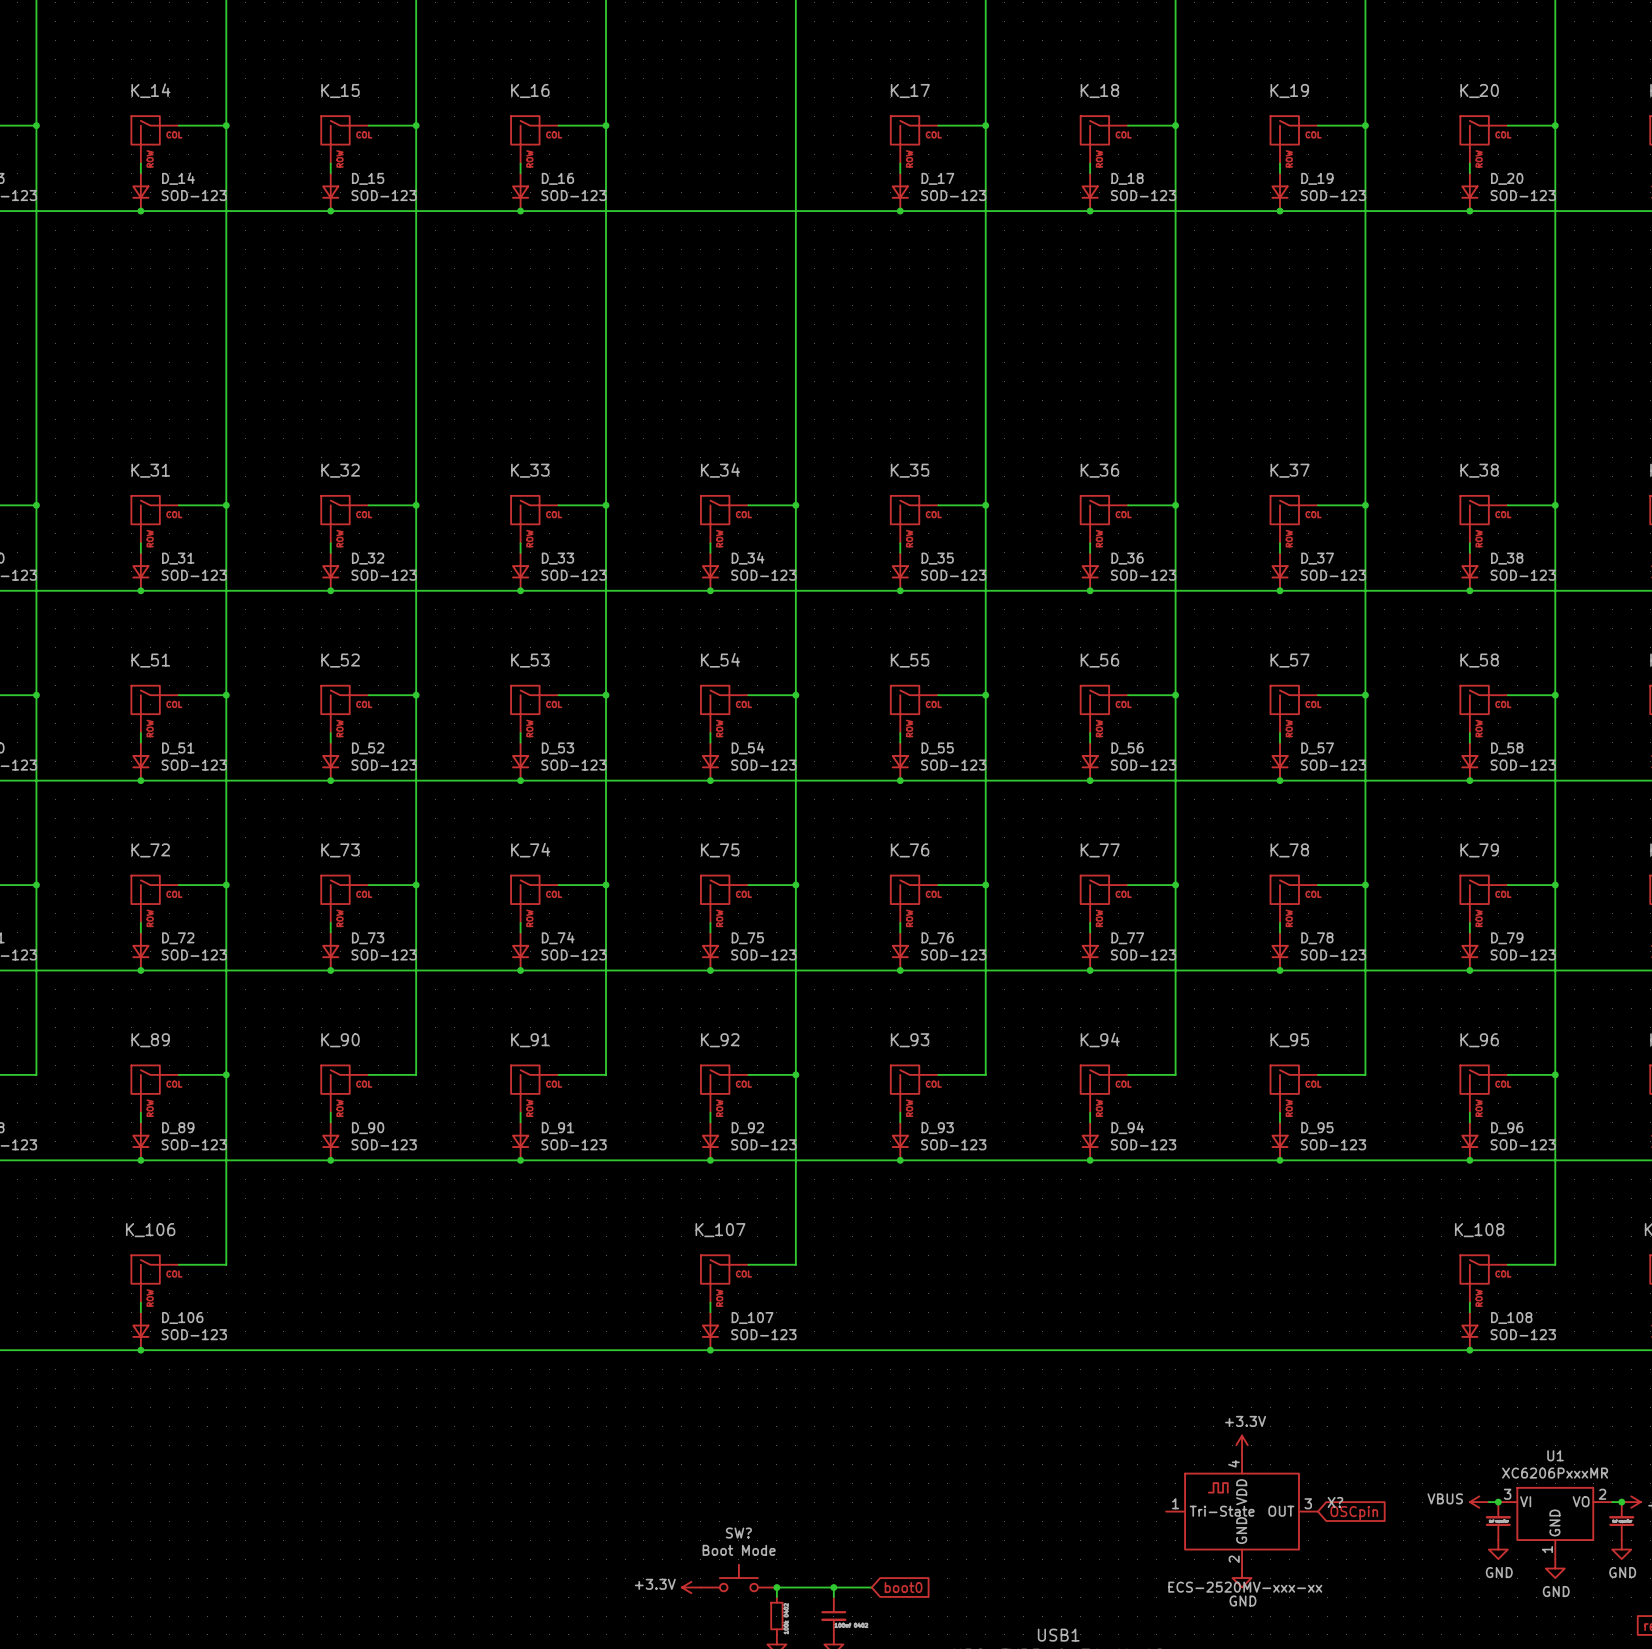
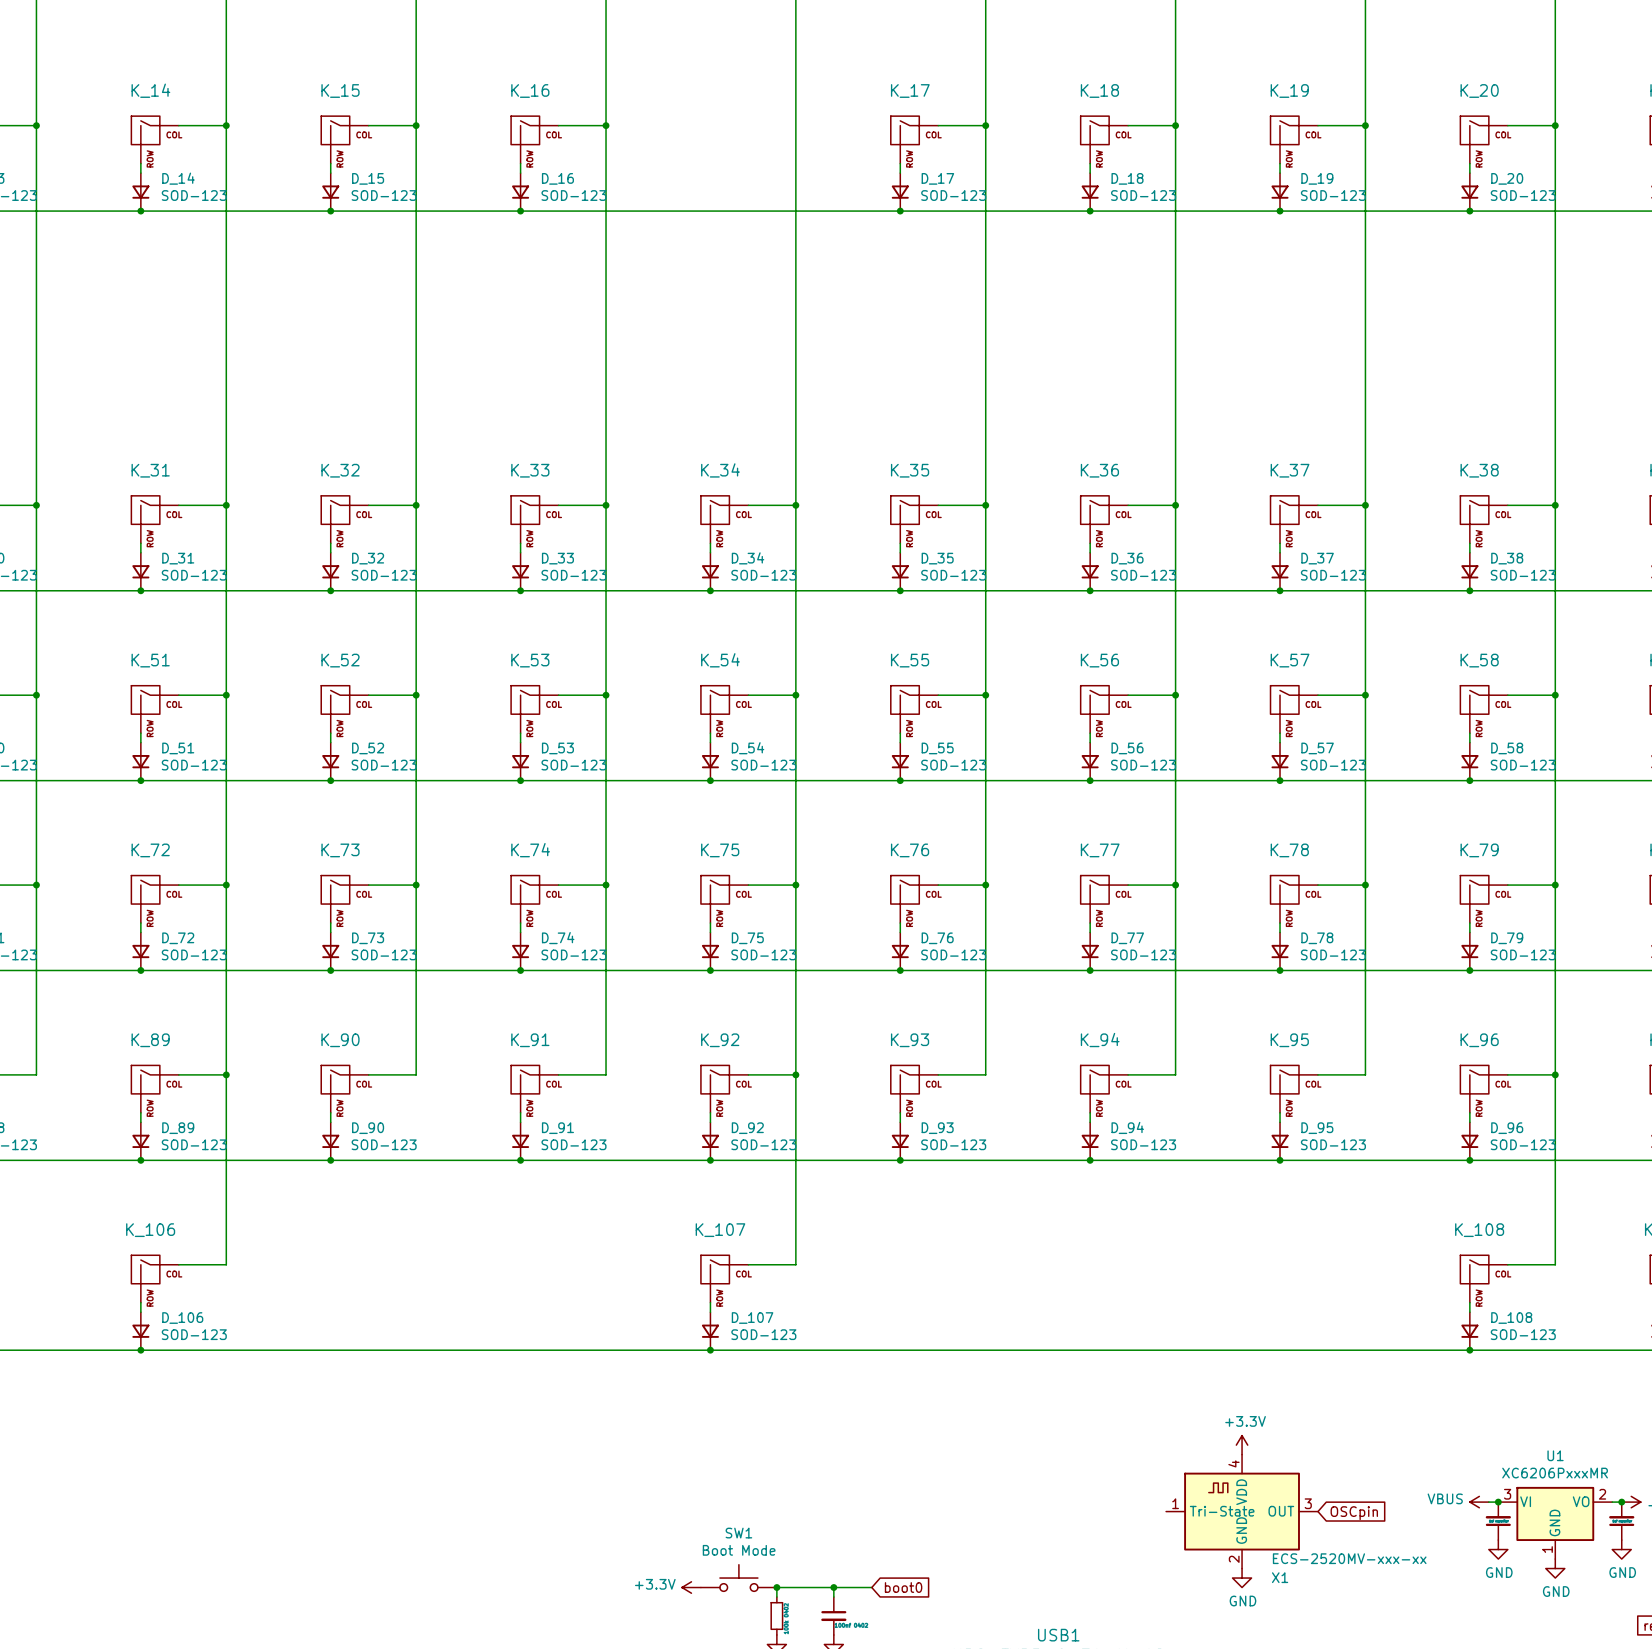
X? name: X? (1335, 1502) -> X1 (1280, 1577)
SW? name: SW? (738, 1533) -> SW1 (738, 1533)
X? value position: ECS-2520MV-xxx-xx (1245, 1587) -> ECS-2520MV-xxx-xx (1349, 1558)

